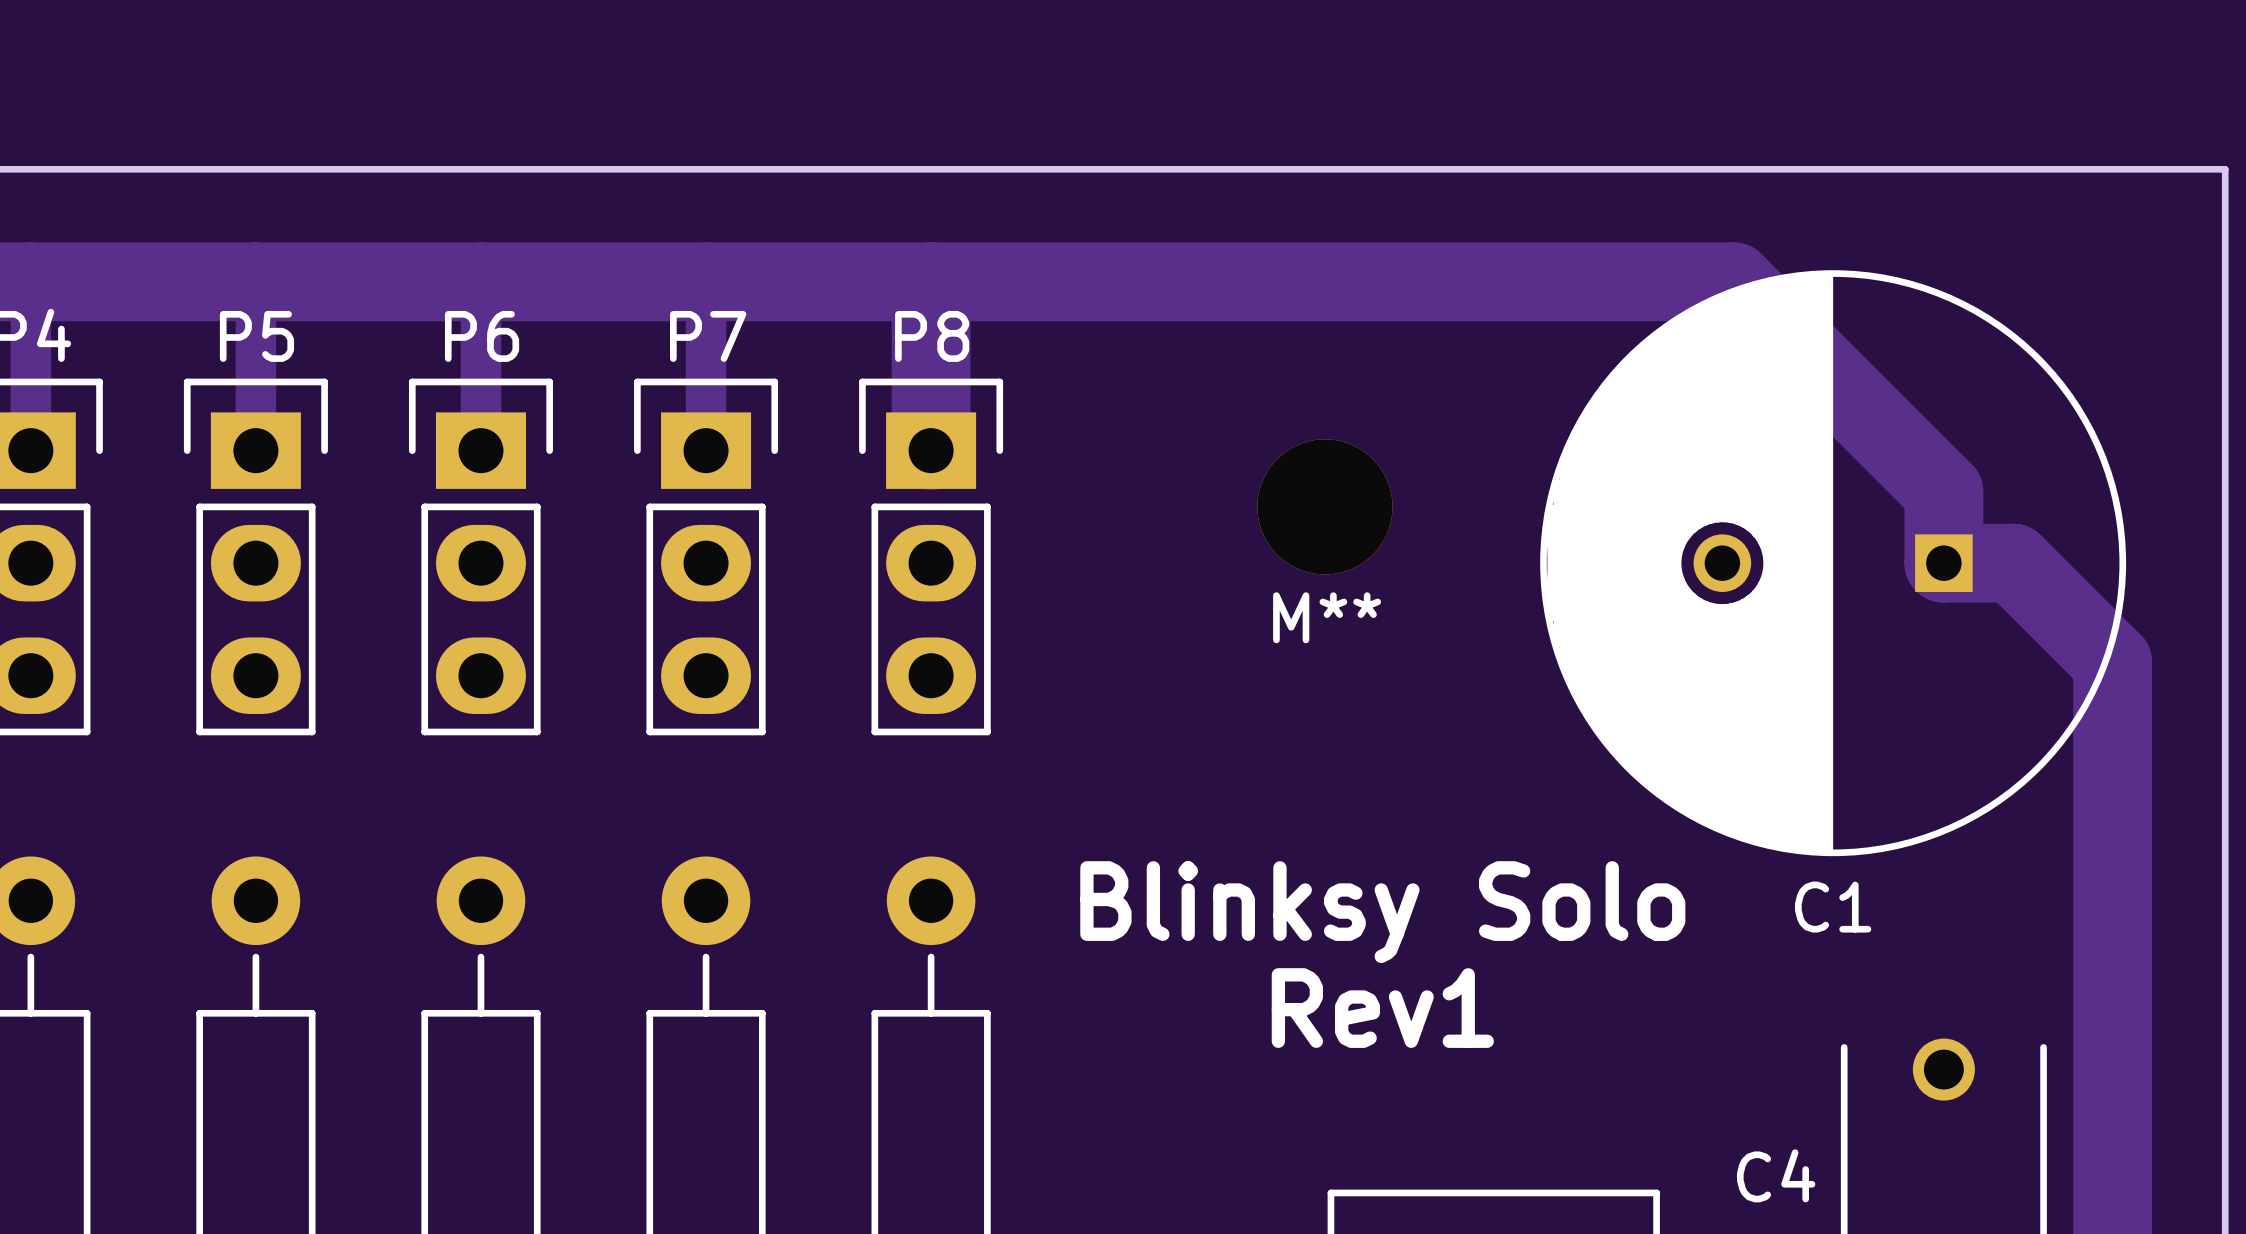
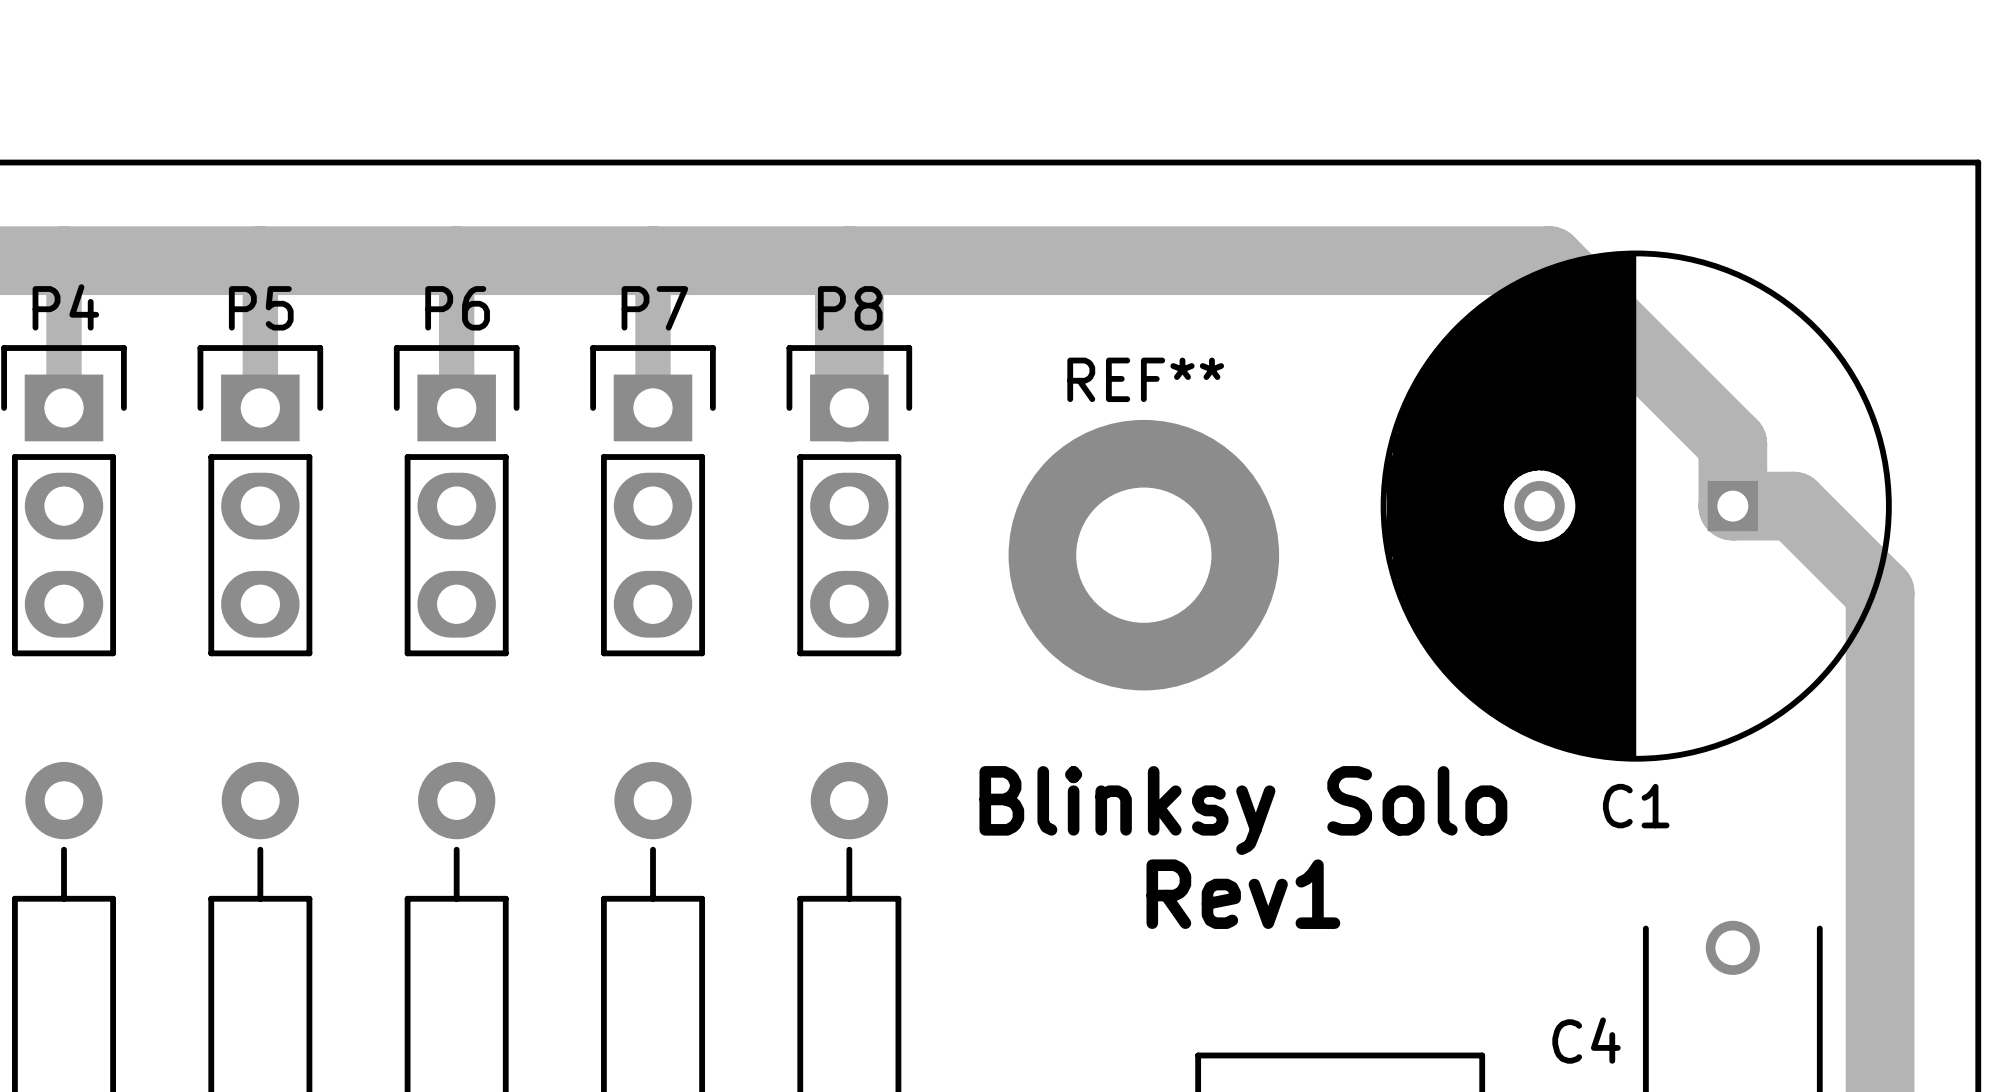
M**: (1324, 506) -> none
REF**: none -> (1143, 555)

